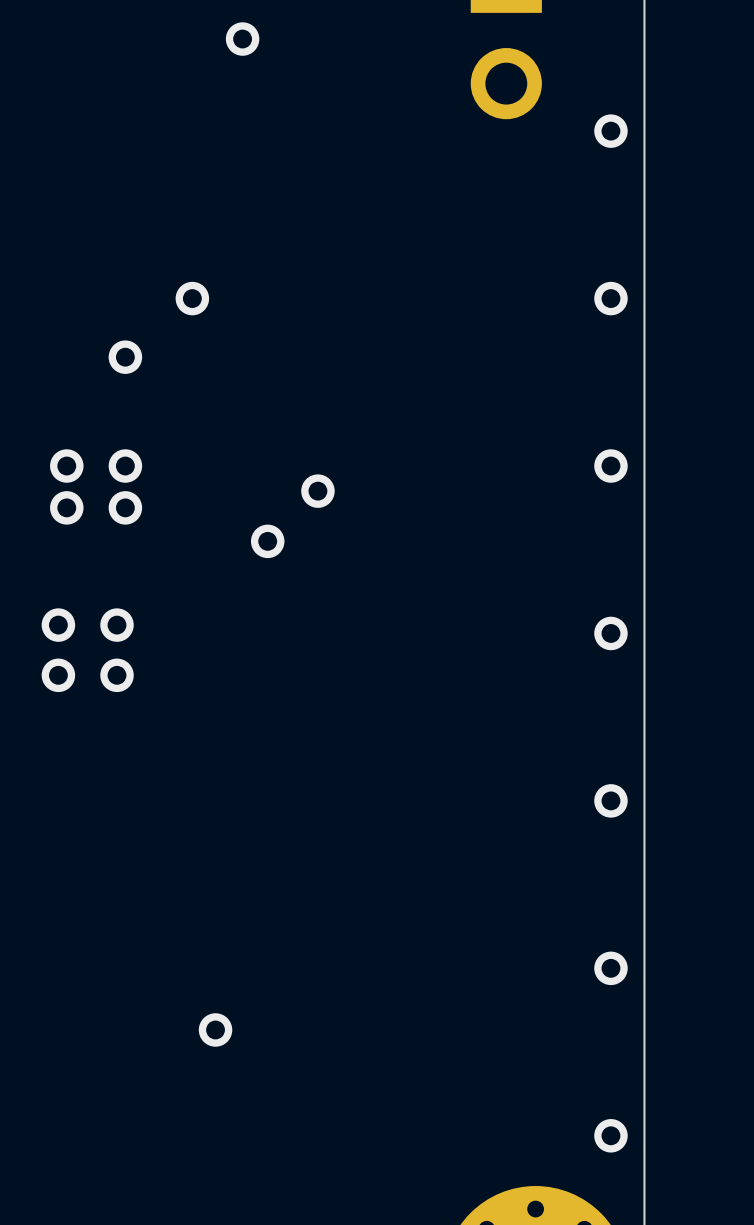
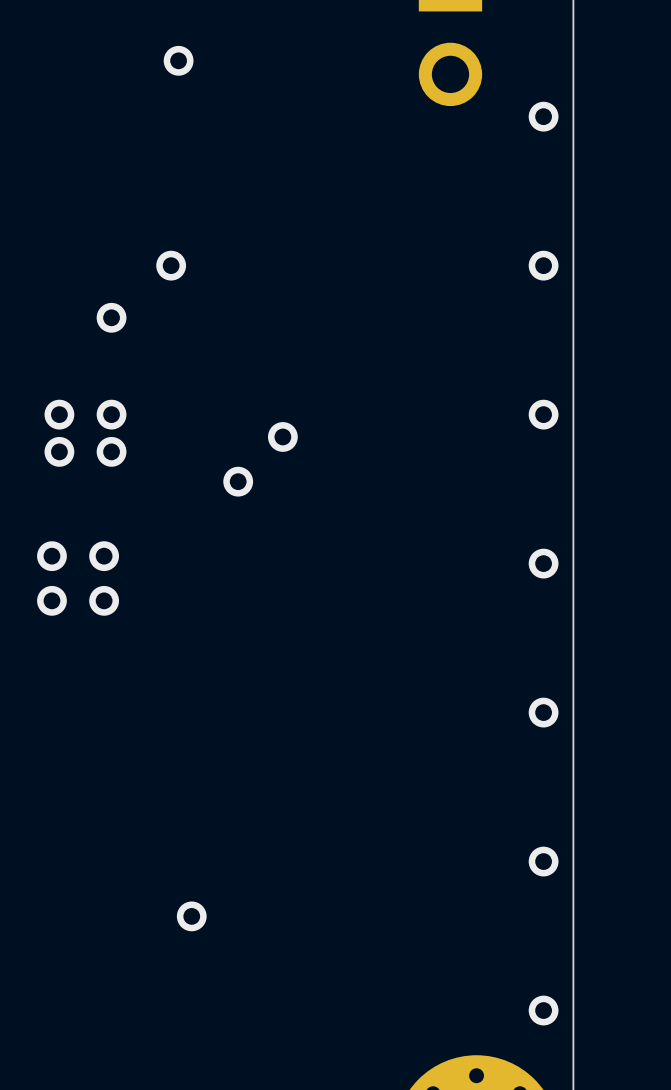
via position: (242, 39) -> (178, 60)

